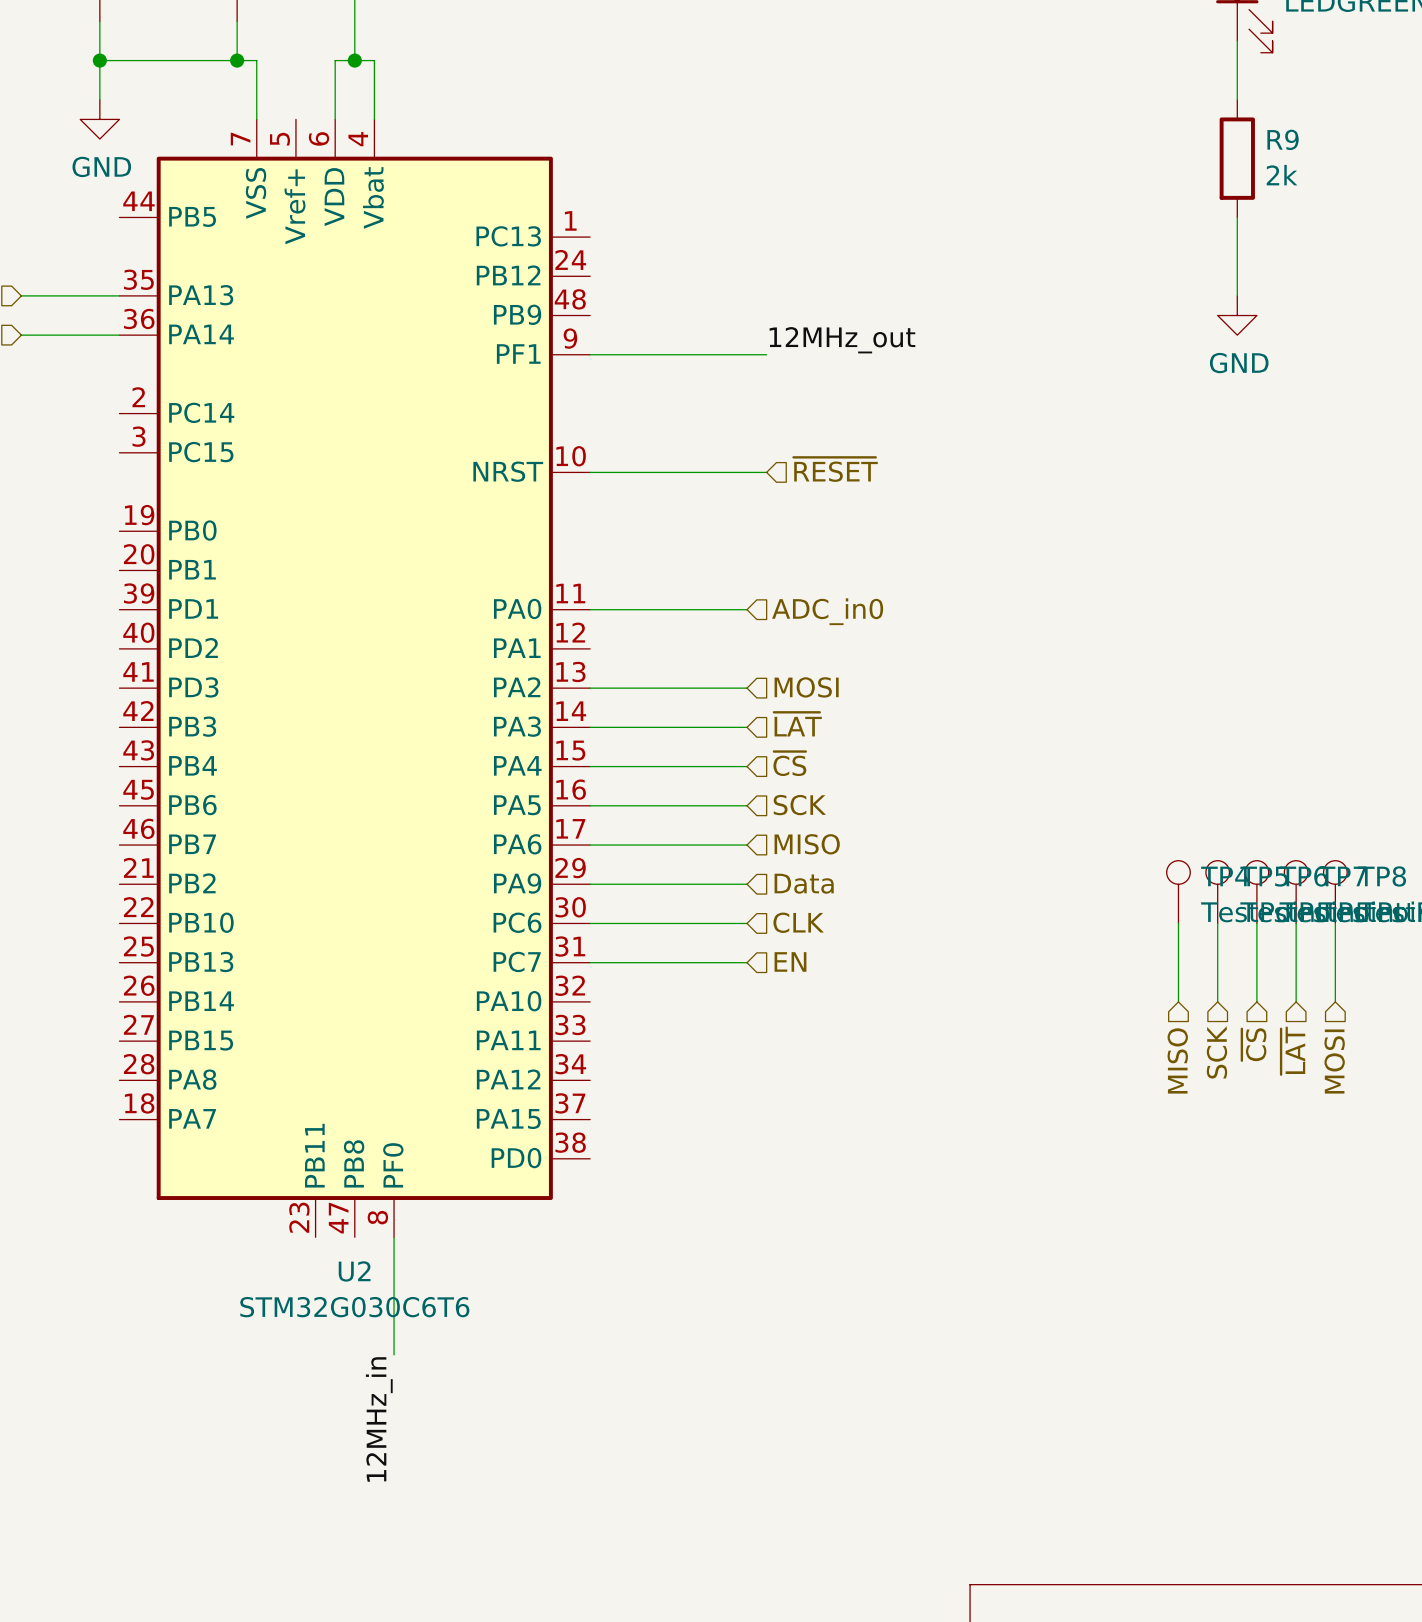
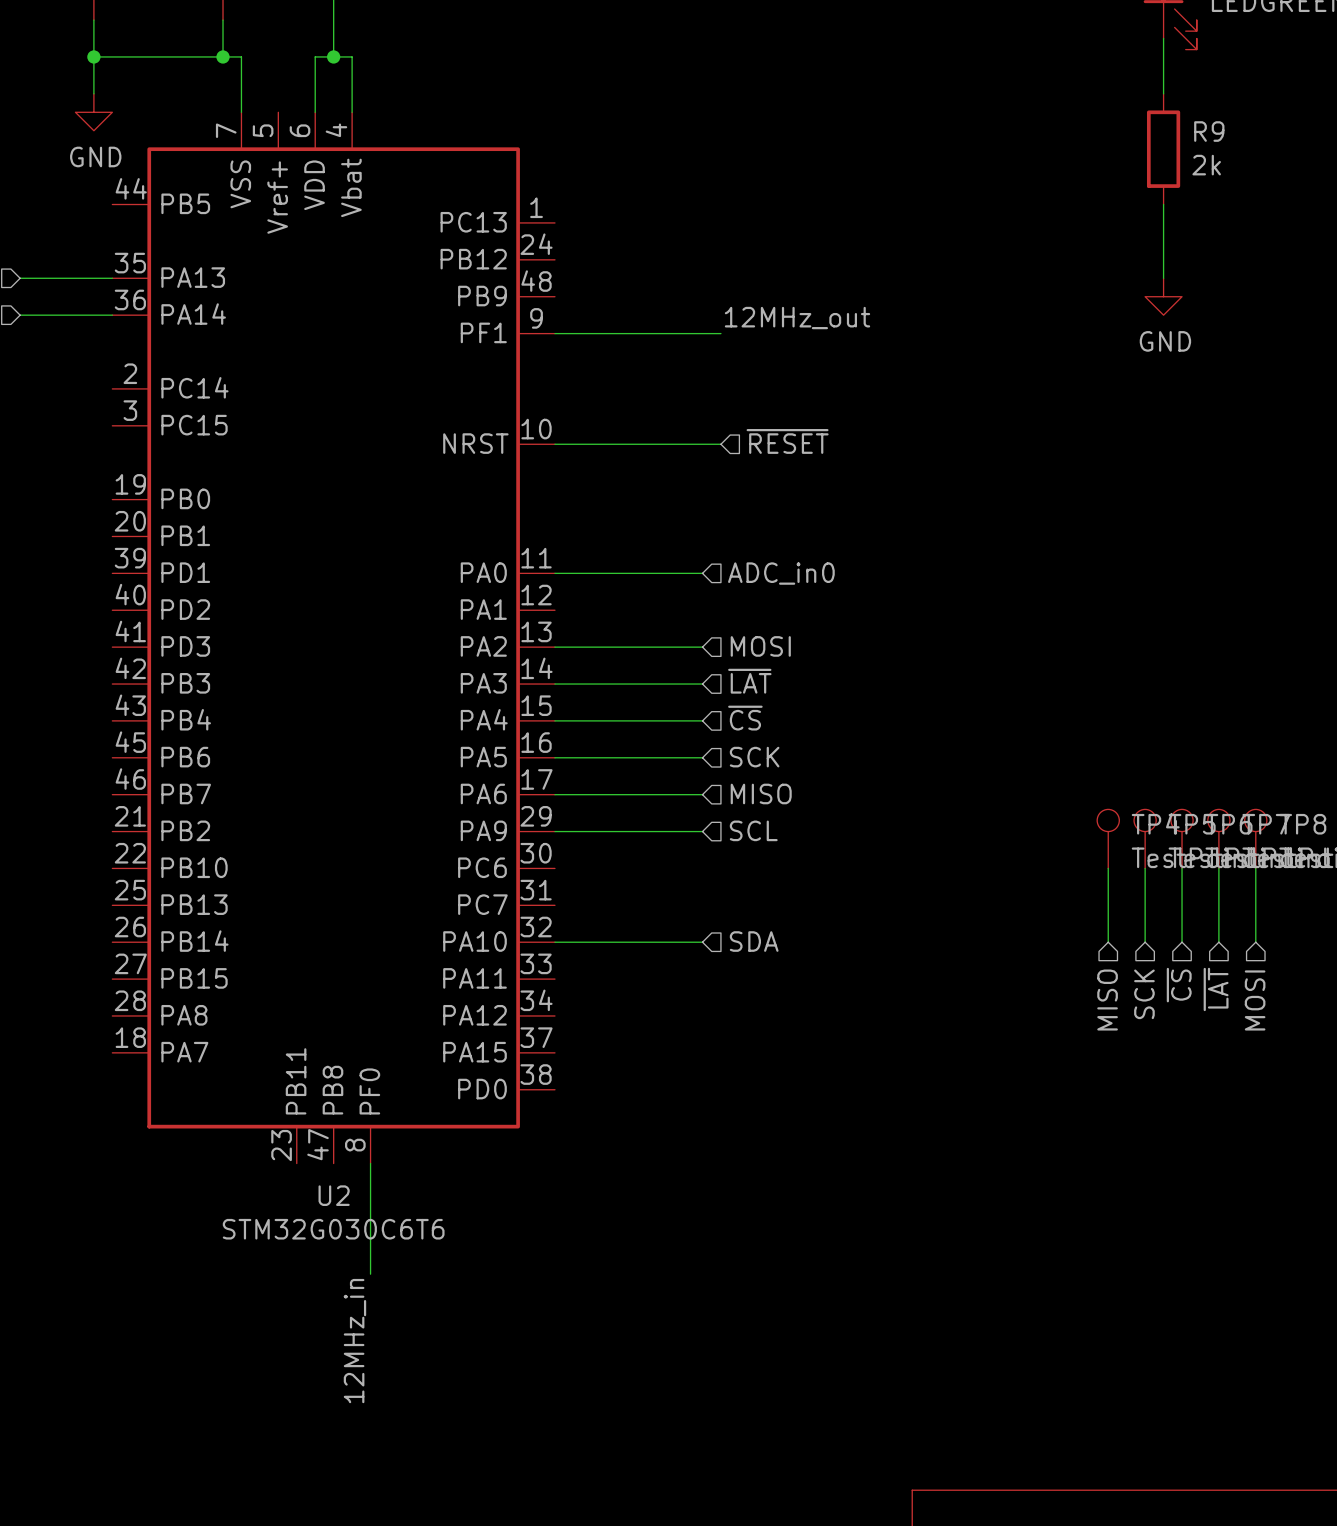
hierarchical label: Data (804, 883) -> SCL (753, 830)
hierarchical label: CLK (798, 922) -> none
wire: (590, 923) (747, 923) -> none
hierarchical label: EN (790, 961) -> none
wire: (590, 962) (747, 962) -> (554, 942) (702, 942)
hierarchical label: none -> SDA (754, 941)

